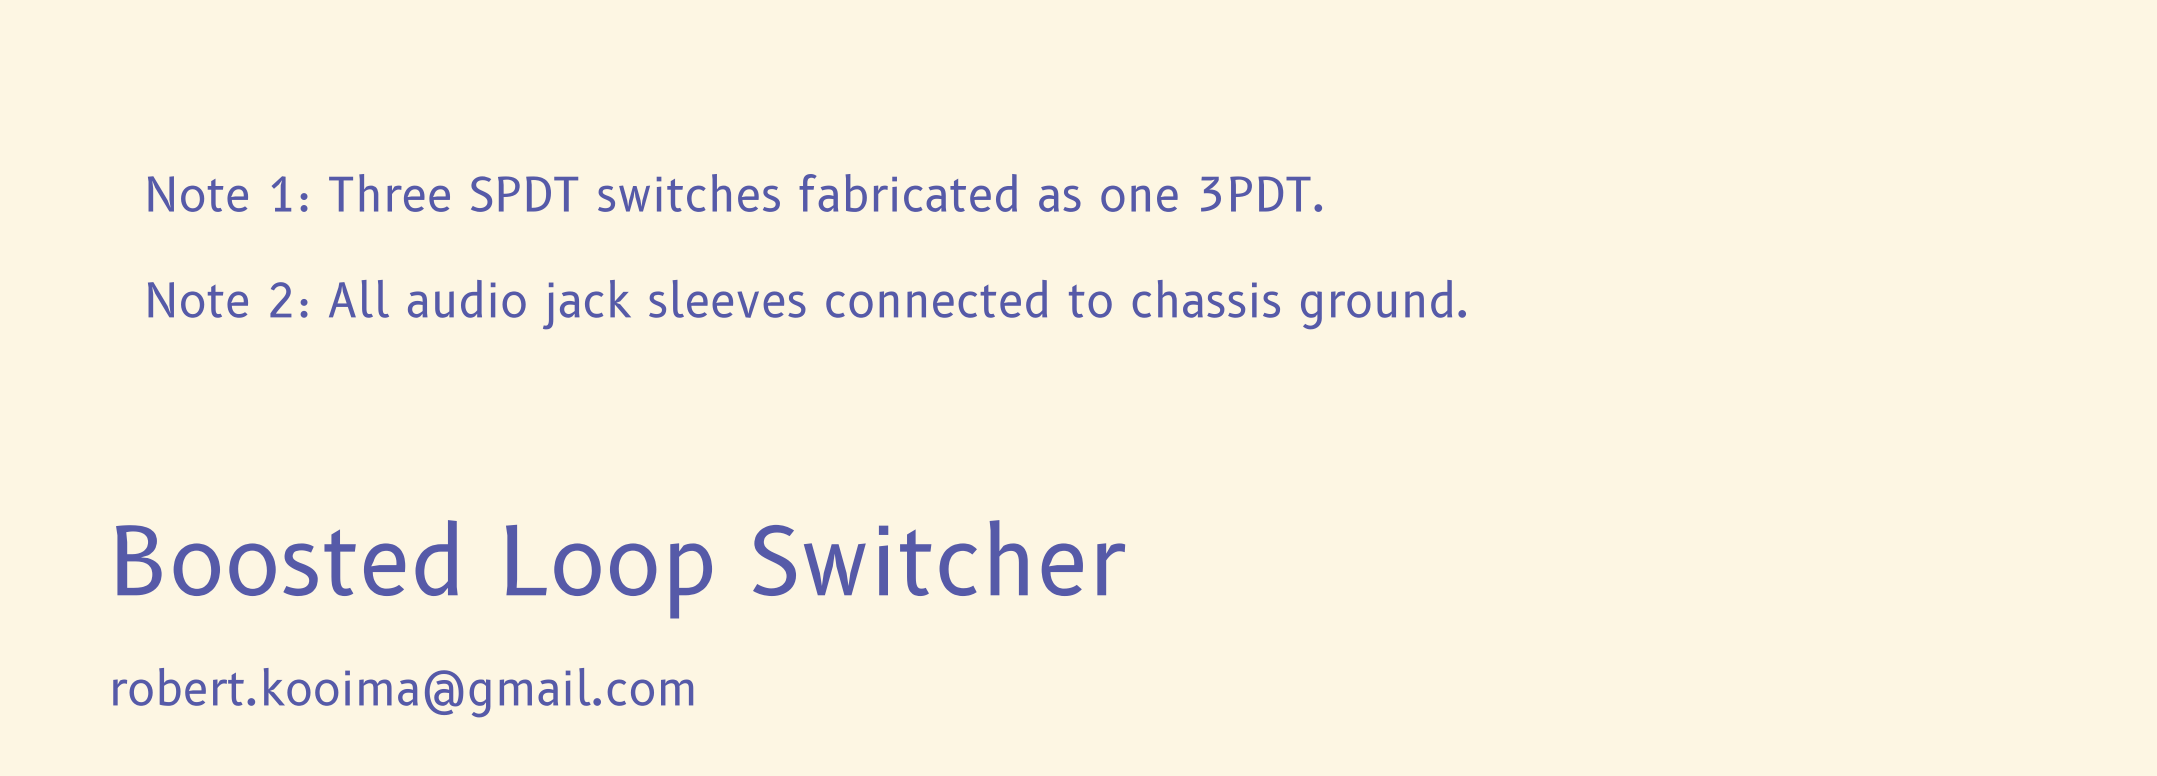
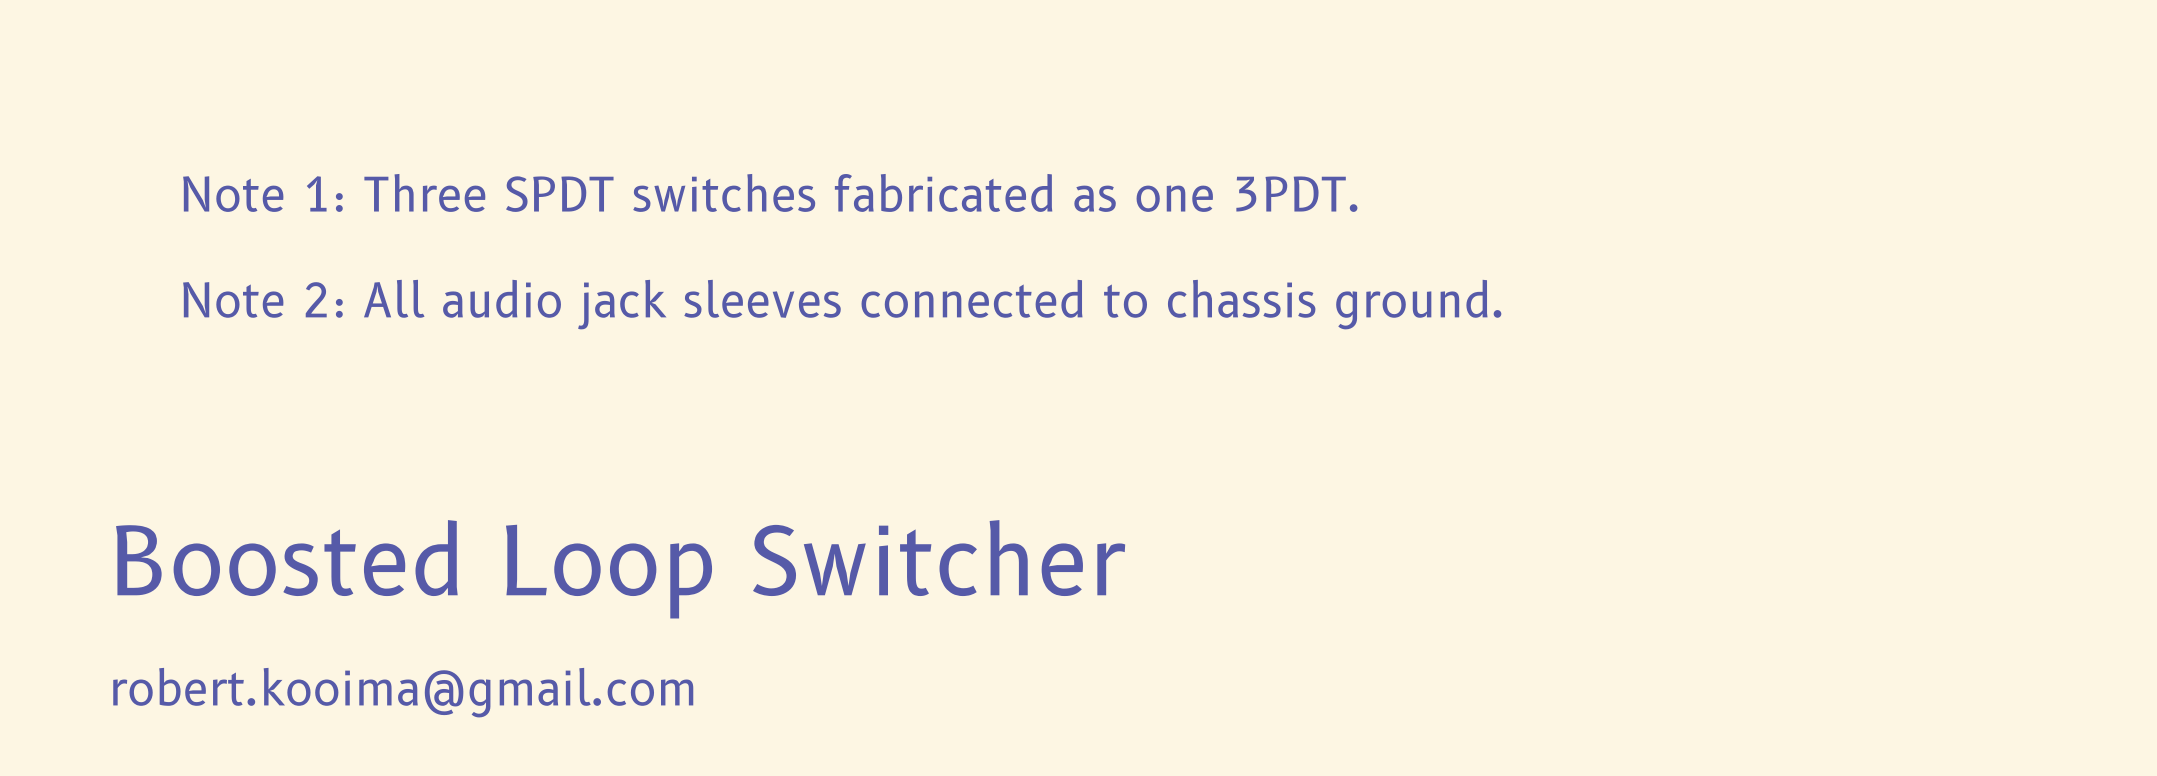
text position: Note 1: Three SPDT switches fabricated as one 3PDT. (734, 192) -> Note 1: Three SPDT switches fabricated as one 3PDT. (770, 192)
text position: Note 2: All audio jack sleeves connected to chassis ground. (806, 304) -> Note 2: All audio jack sleeves connected to chassis ground. (842, 304)

